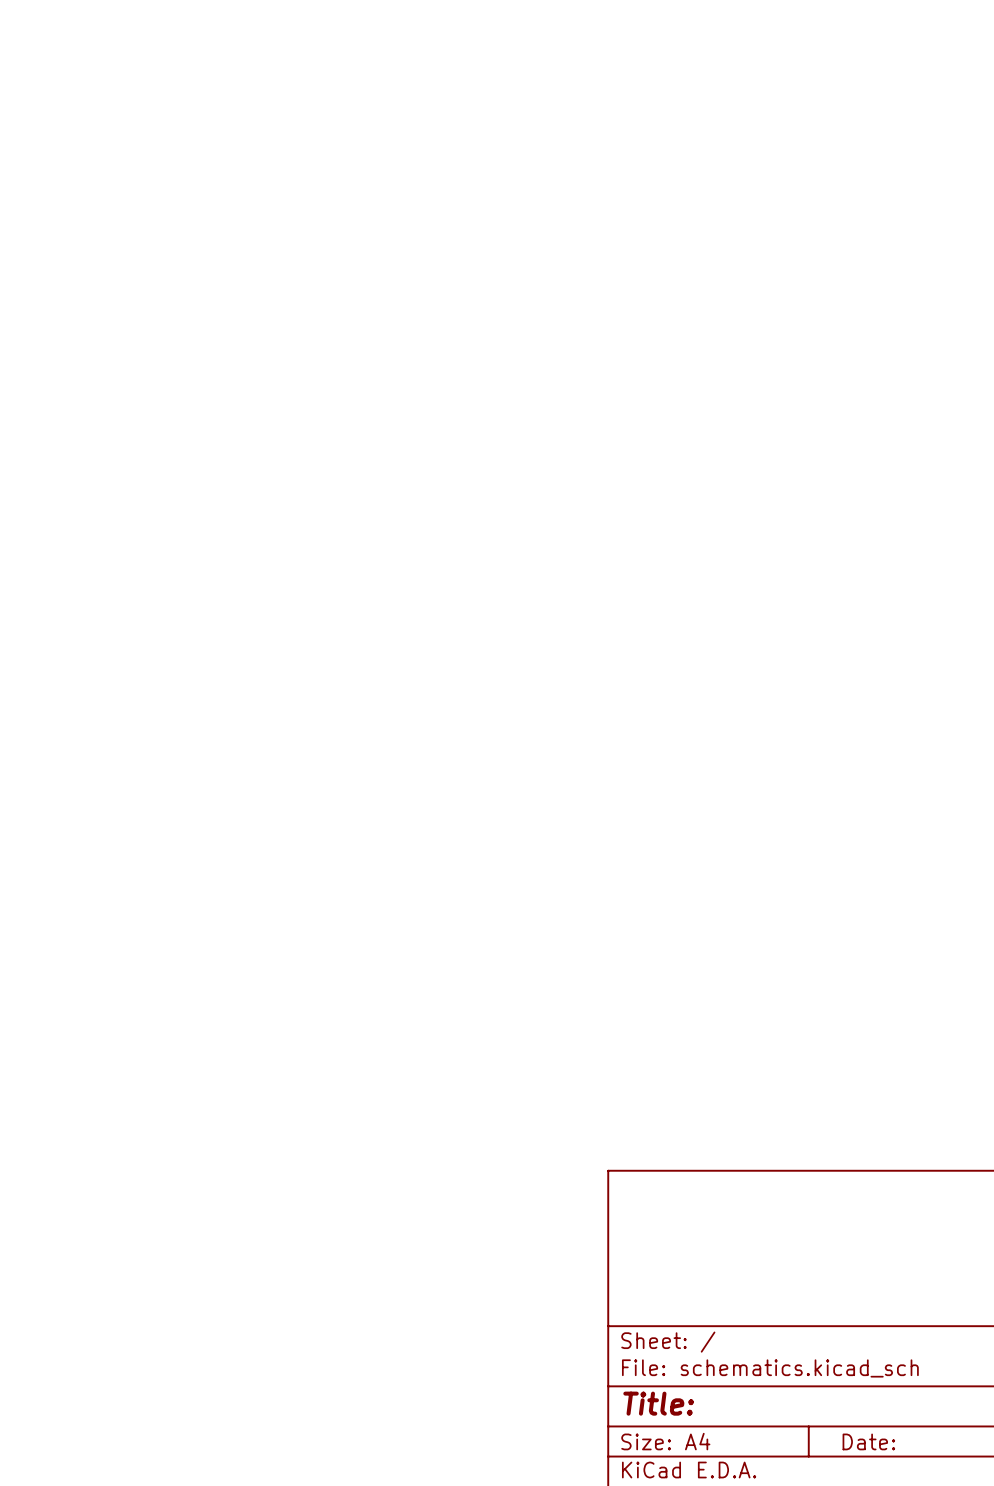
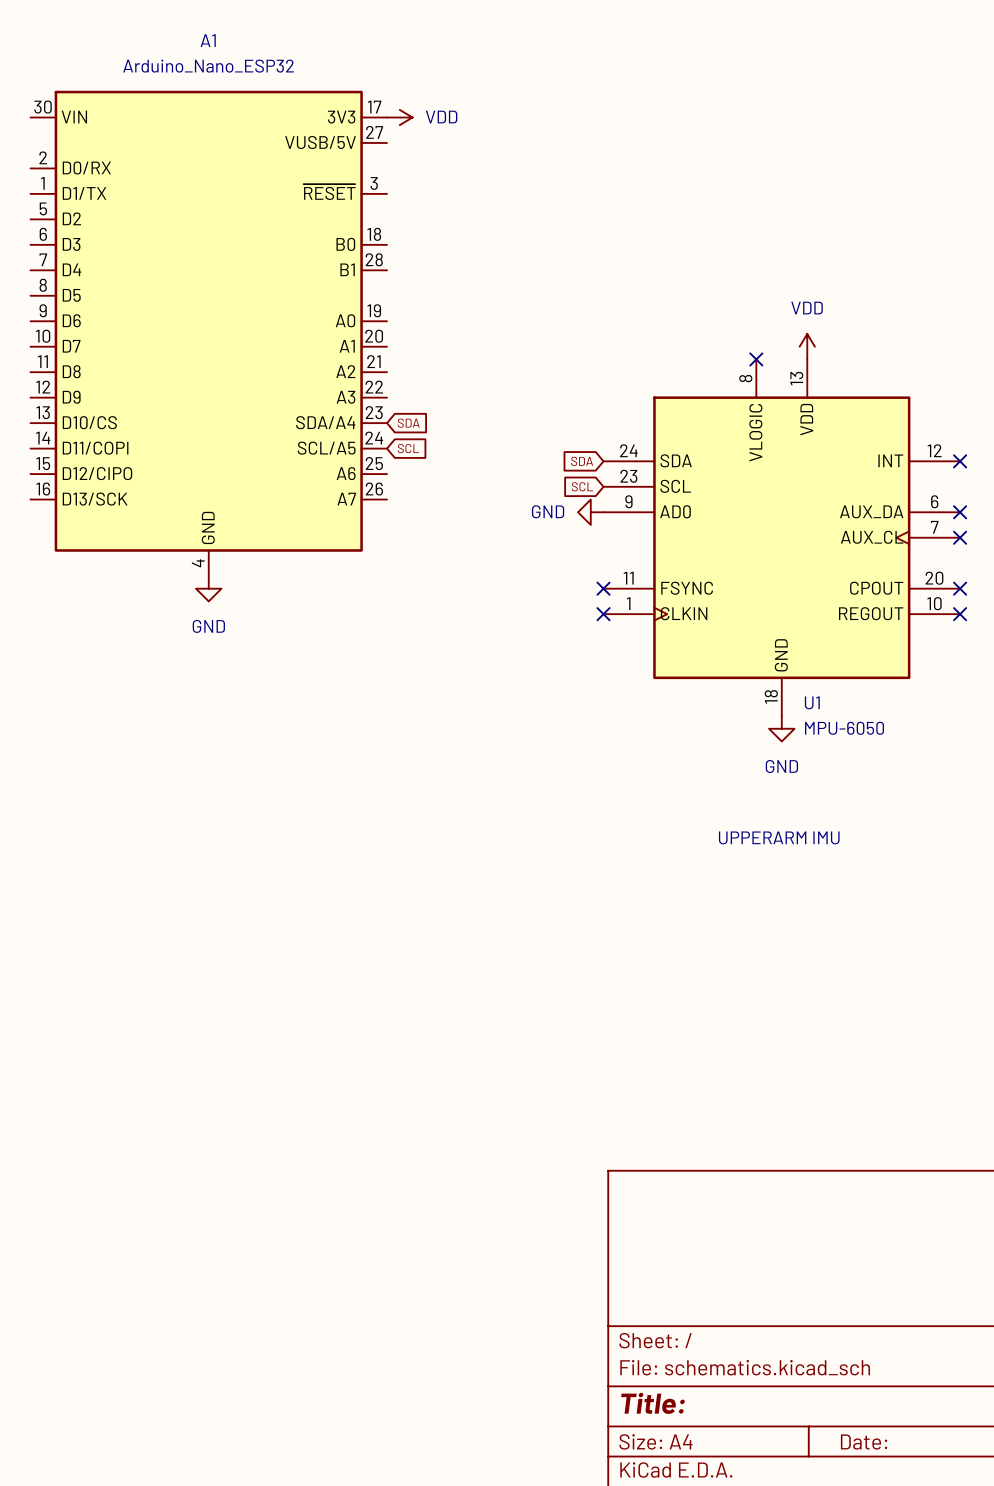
power symbol: none -> VDD (399, 117)
A1: none -> Arduino_Nano_ESP32 (208, 333)
power symbol: none -> VDD (807, 346)
no-connect mark: none -> (756, 359)
global label: none -> SDA (408, 423)
global label: none -> SCL (408, 448)
global label: none -> SDA (582, 461)
no-connect mark: none -> (960, 461)
global label: none -> SCL (582, 486)
power symbol: none -> GND (590, 512)
no-connect mark: none -> (960, 512)
U1: none -> MPU-6050 (781, 537)
no-connect mark: none -> (960, 537)
power symbol: none -> GND (208, 588)
no-connect mark: none -> (603, 588)
no-connect mark: none -> (960, 588)
no-connect mark: none -> (603, 614)
no-connect mark: none -> (960, 614)
power symbol: none -> GND (781, 728)
text: none -> UPPERARM IMU (779, 837)

